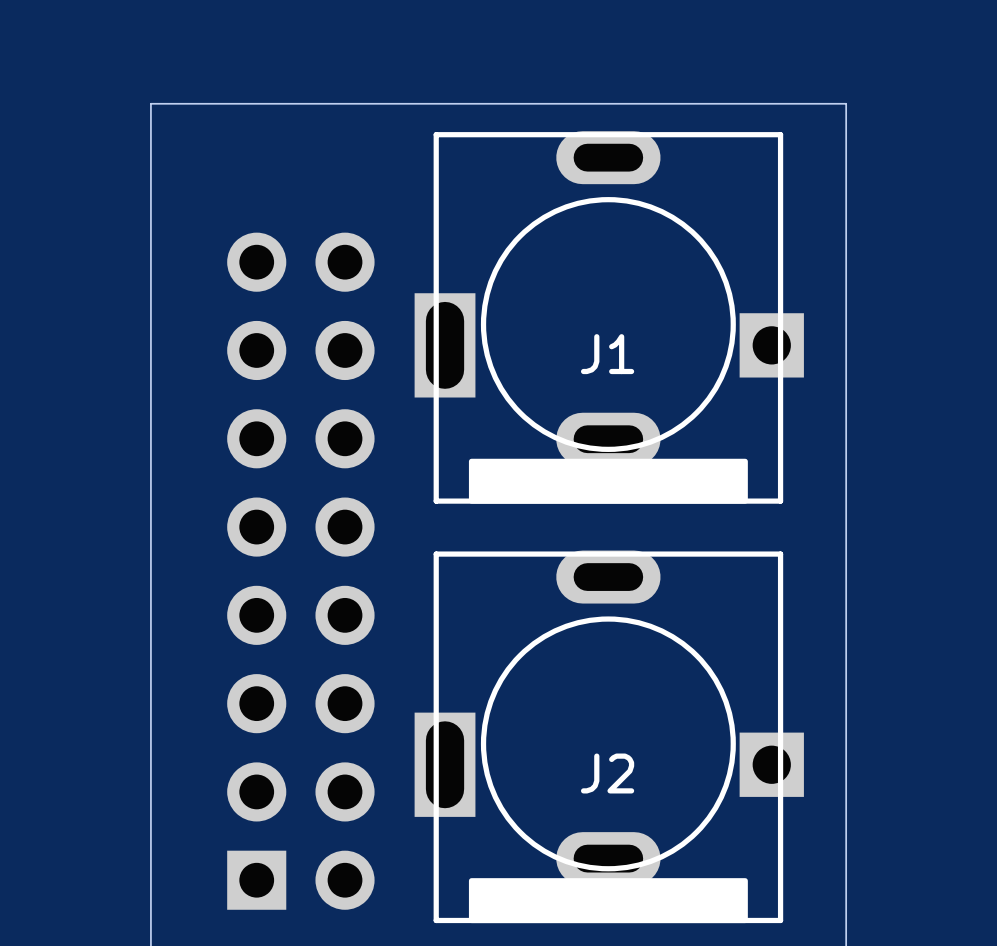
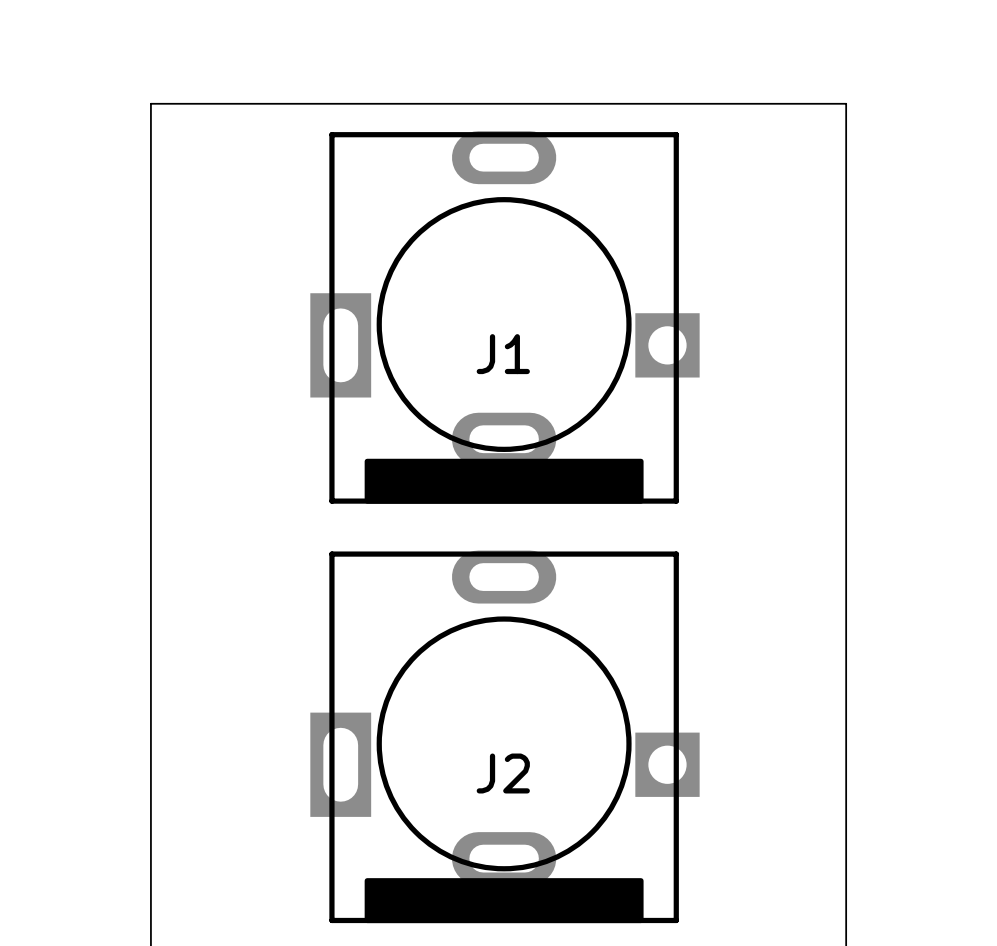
J1 footprint: [414, 131, 804, 504] -> [310, 131, 700, 504]
J2 footprint: [414, 550, 804, 924] -> [310, 550, 700, 924]
part: (300, 571) -> none

